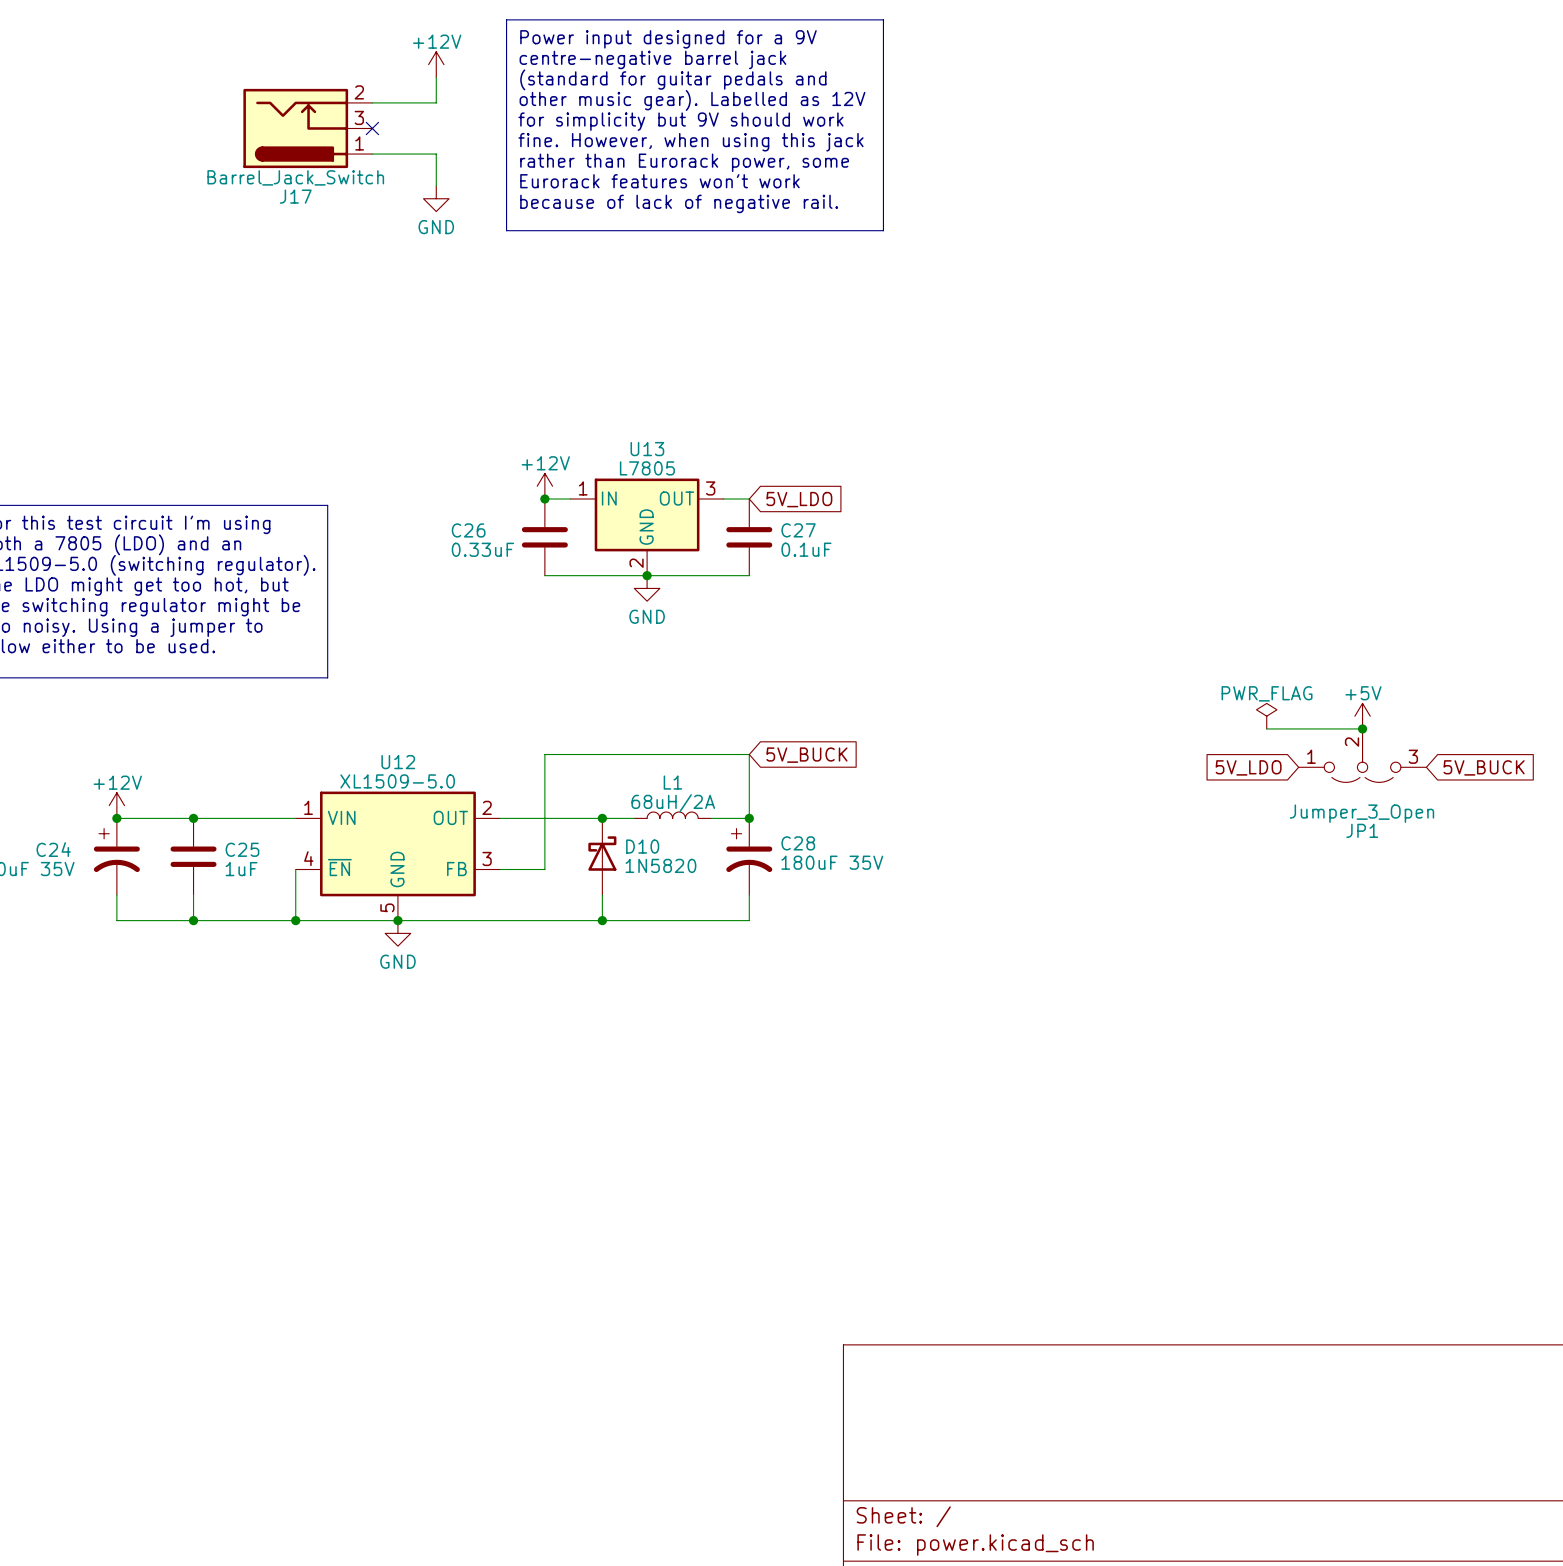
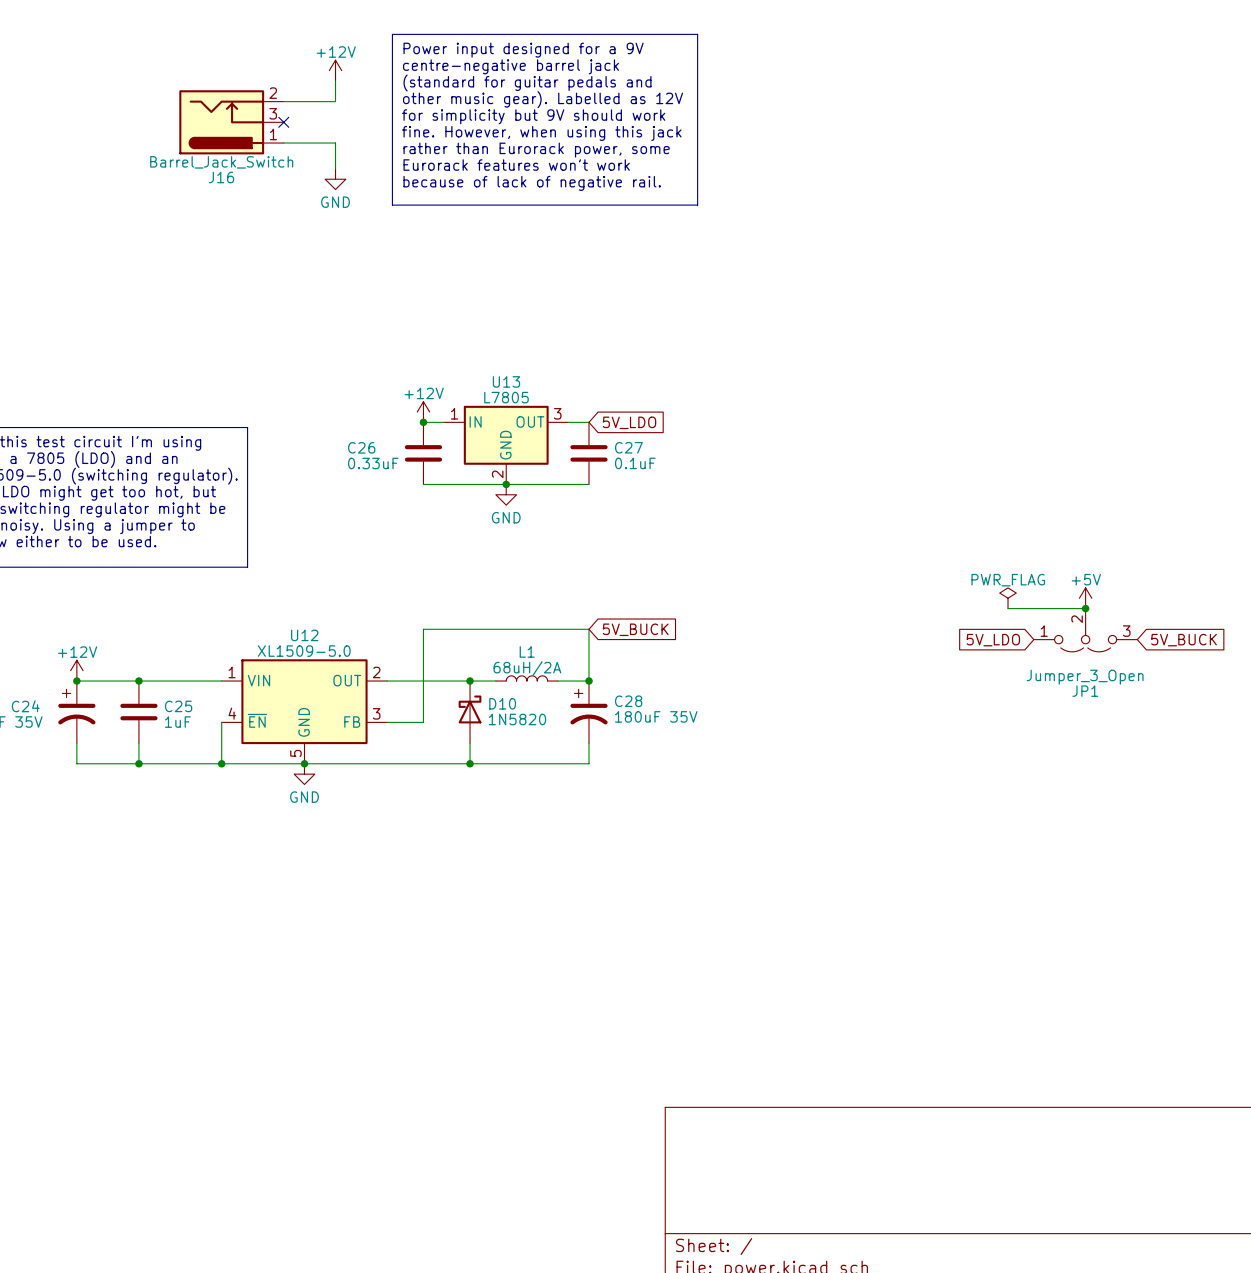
J17 name: J17 (295, 196) -> J16 (221, 177)

